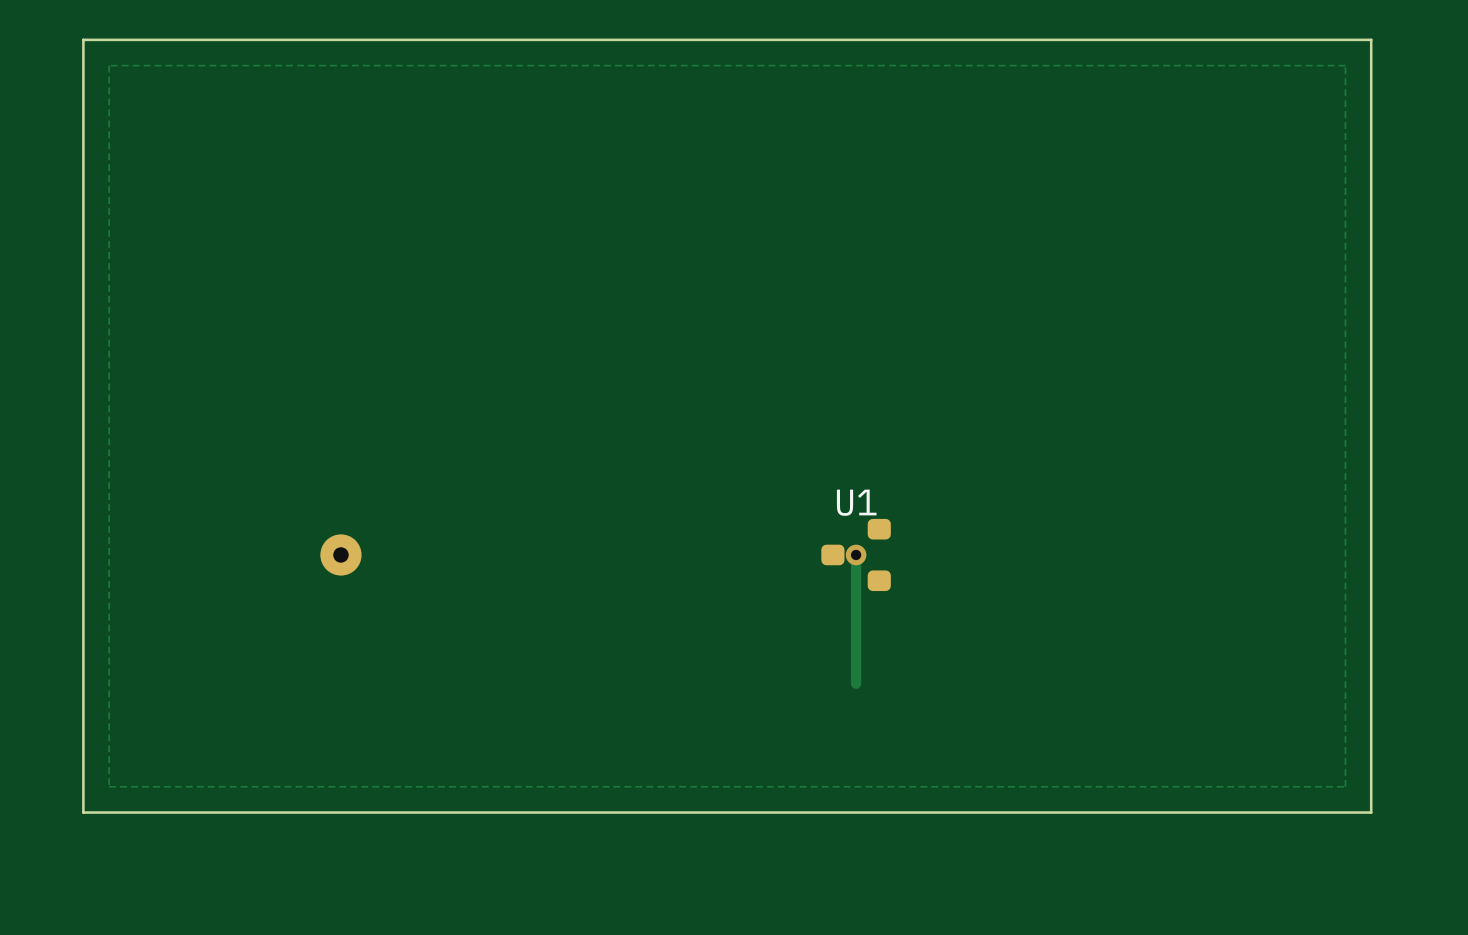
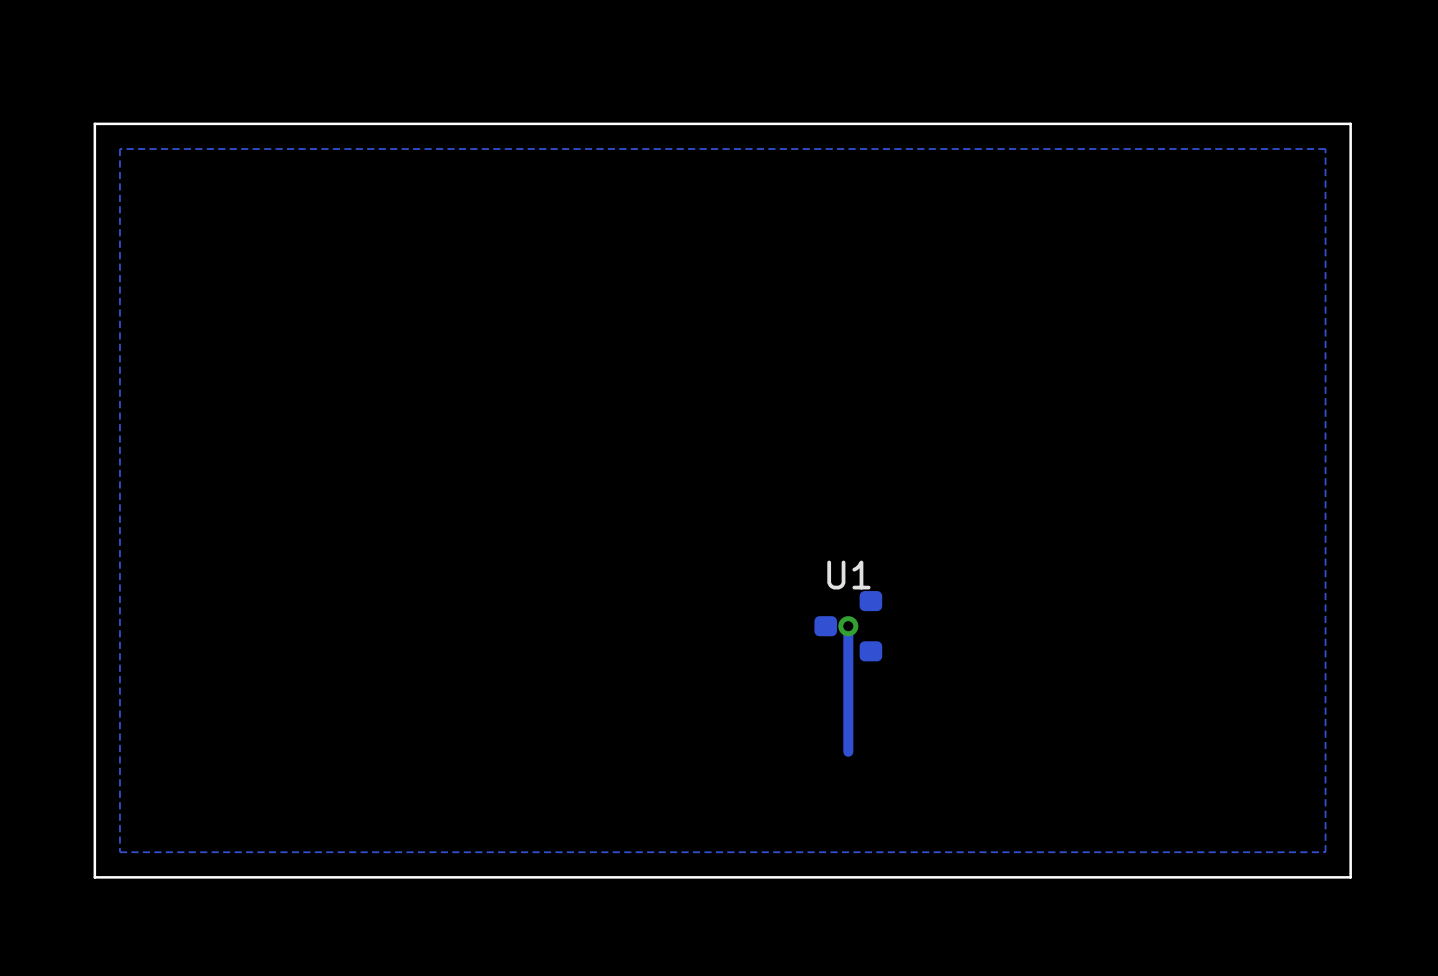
part: (340, 554) -> none

